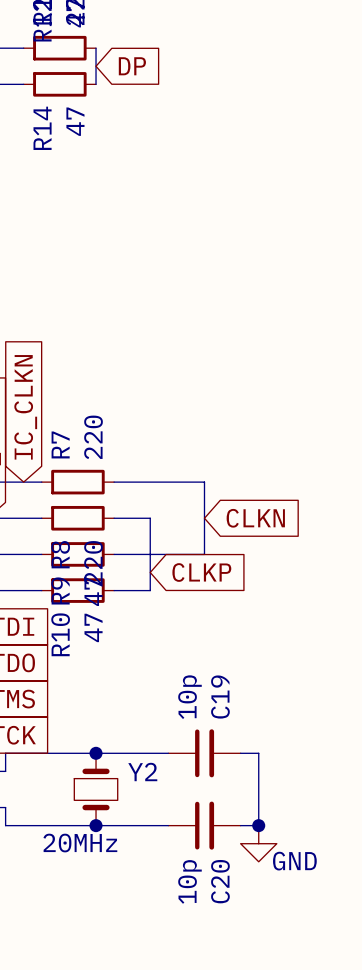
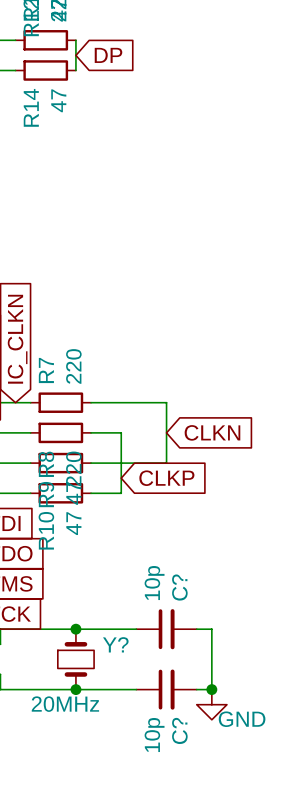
C19 name: C19 (220, 697) -> C? (179, 587)
Y2 name: Y2 (142, 772) -> Y? (115, 644)
C20 name: C20 (220, 881) -> C? (179, 730)

